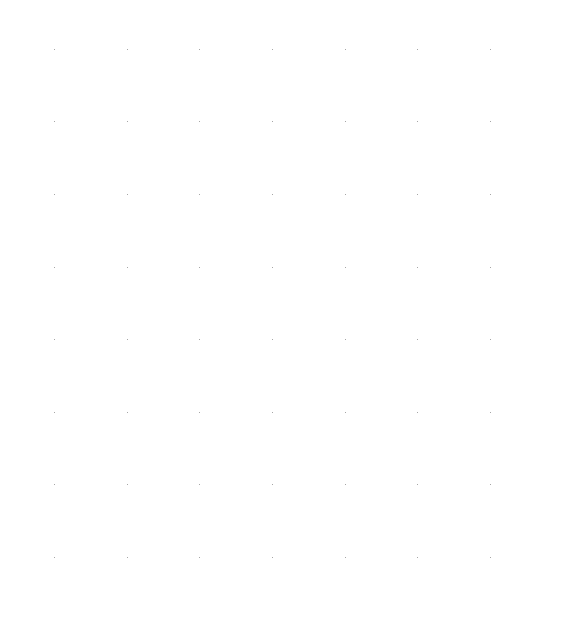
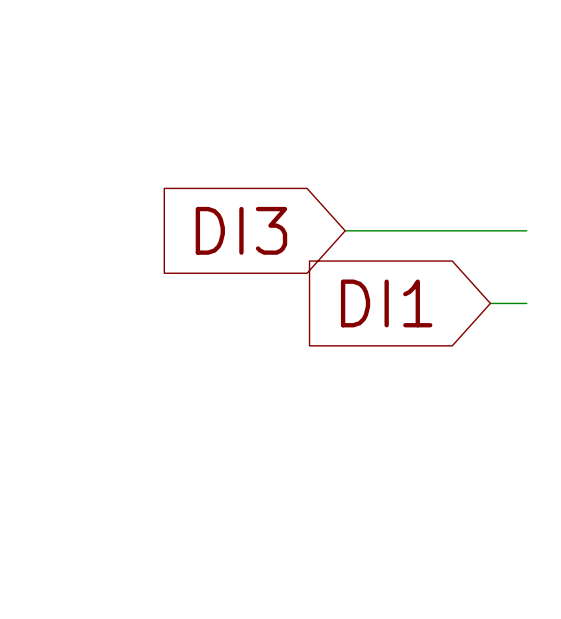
global label: none -> DI3 (241, 230)
wire: none -> (345, 230) (526, 230)
global label: none -> DI1 (386, 303)
wire: none -> (490, 303) (526, 303)

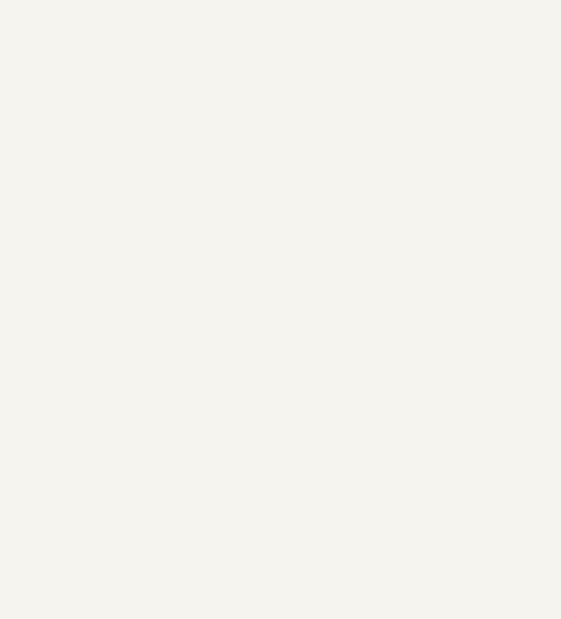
global label: DI3 (241, 230) -> none
wire: (345, 230) (526, 230) -> none
global label: DI1 (386, 303) -> none
wire: (490, 303) (526, 303) -> none

